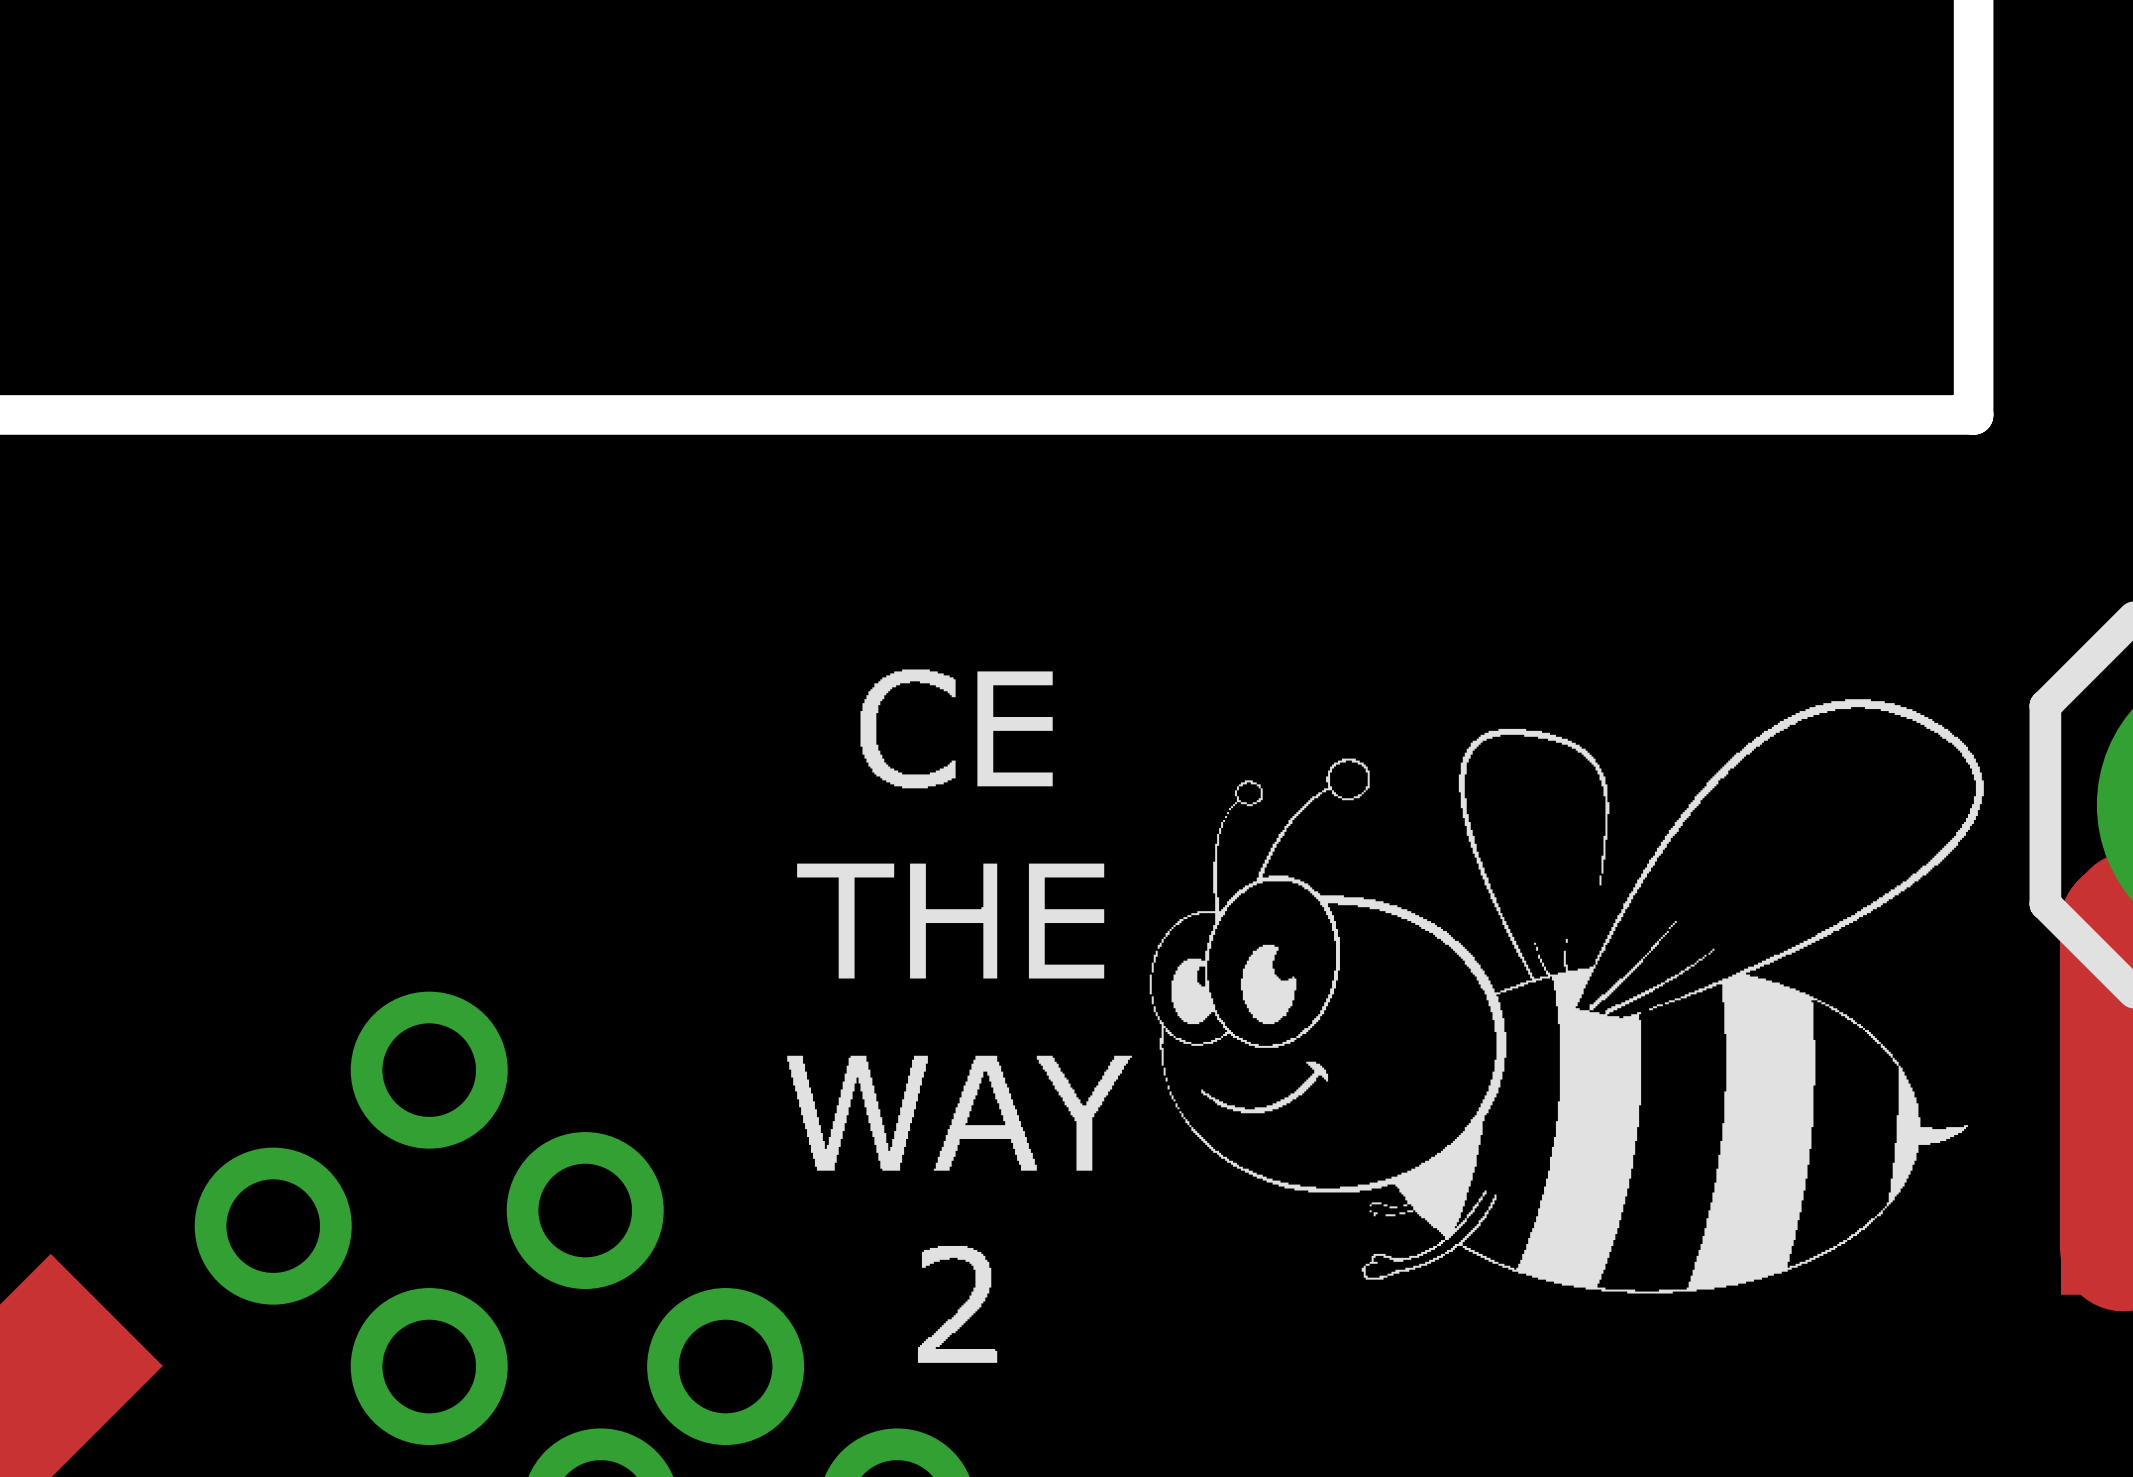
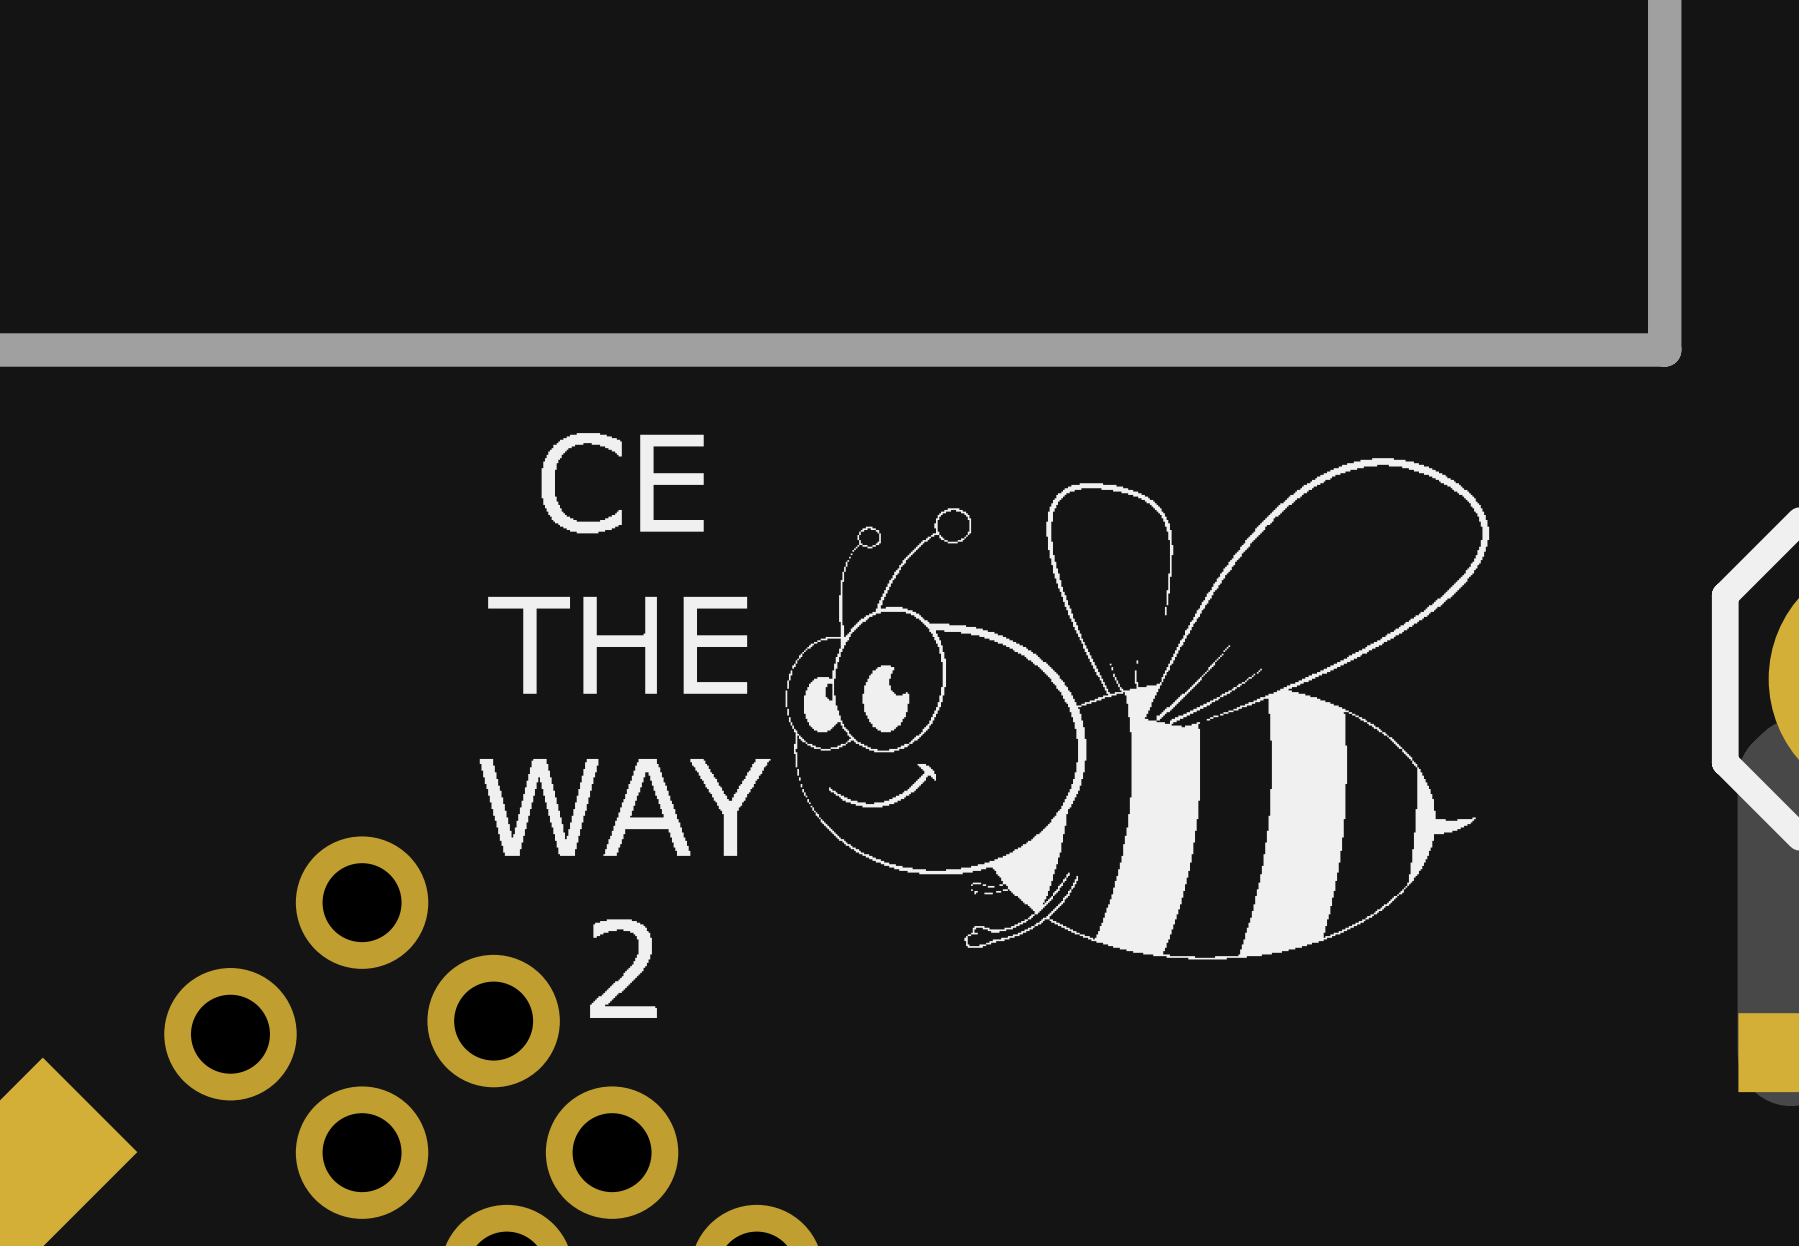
drawing position: (1385, 1016) -> (984, 725)

